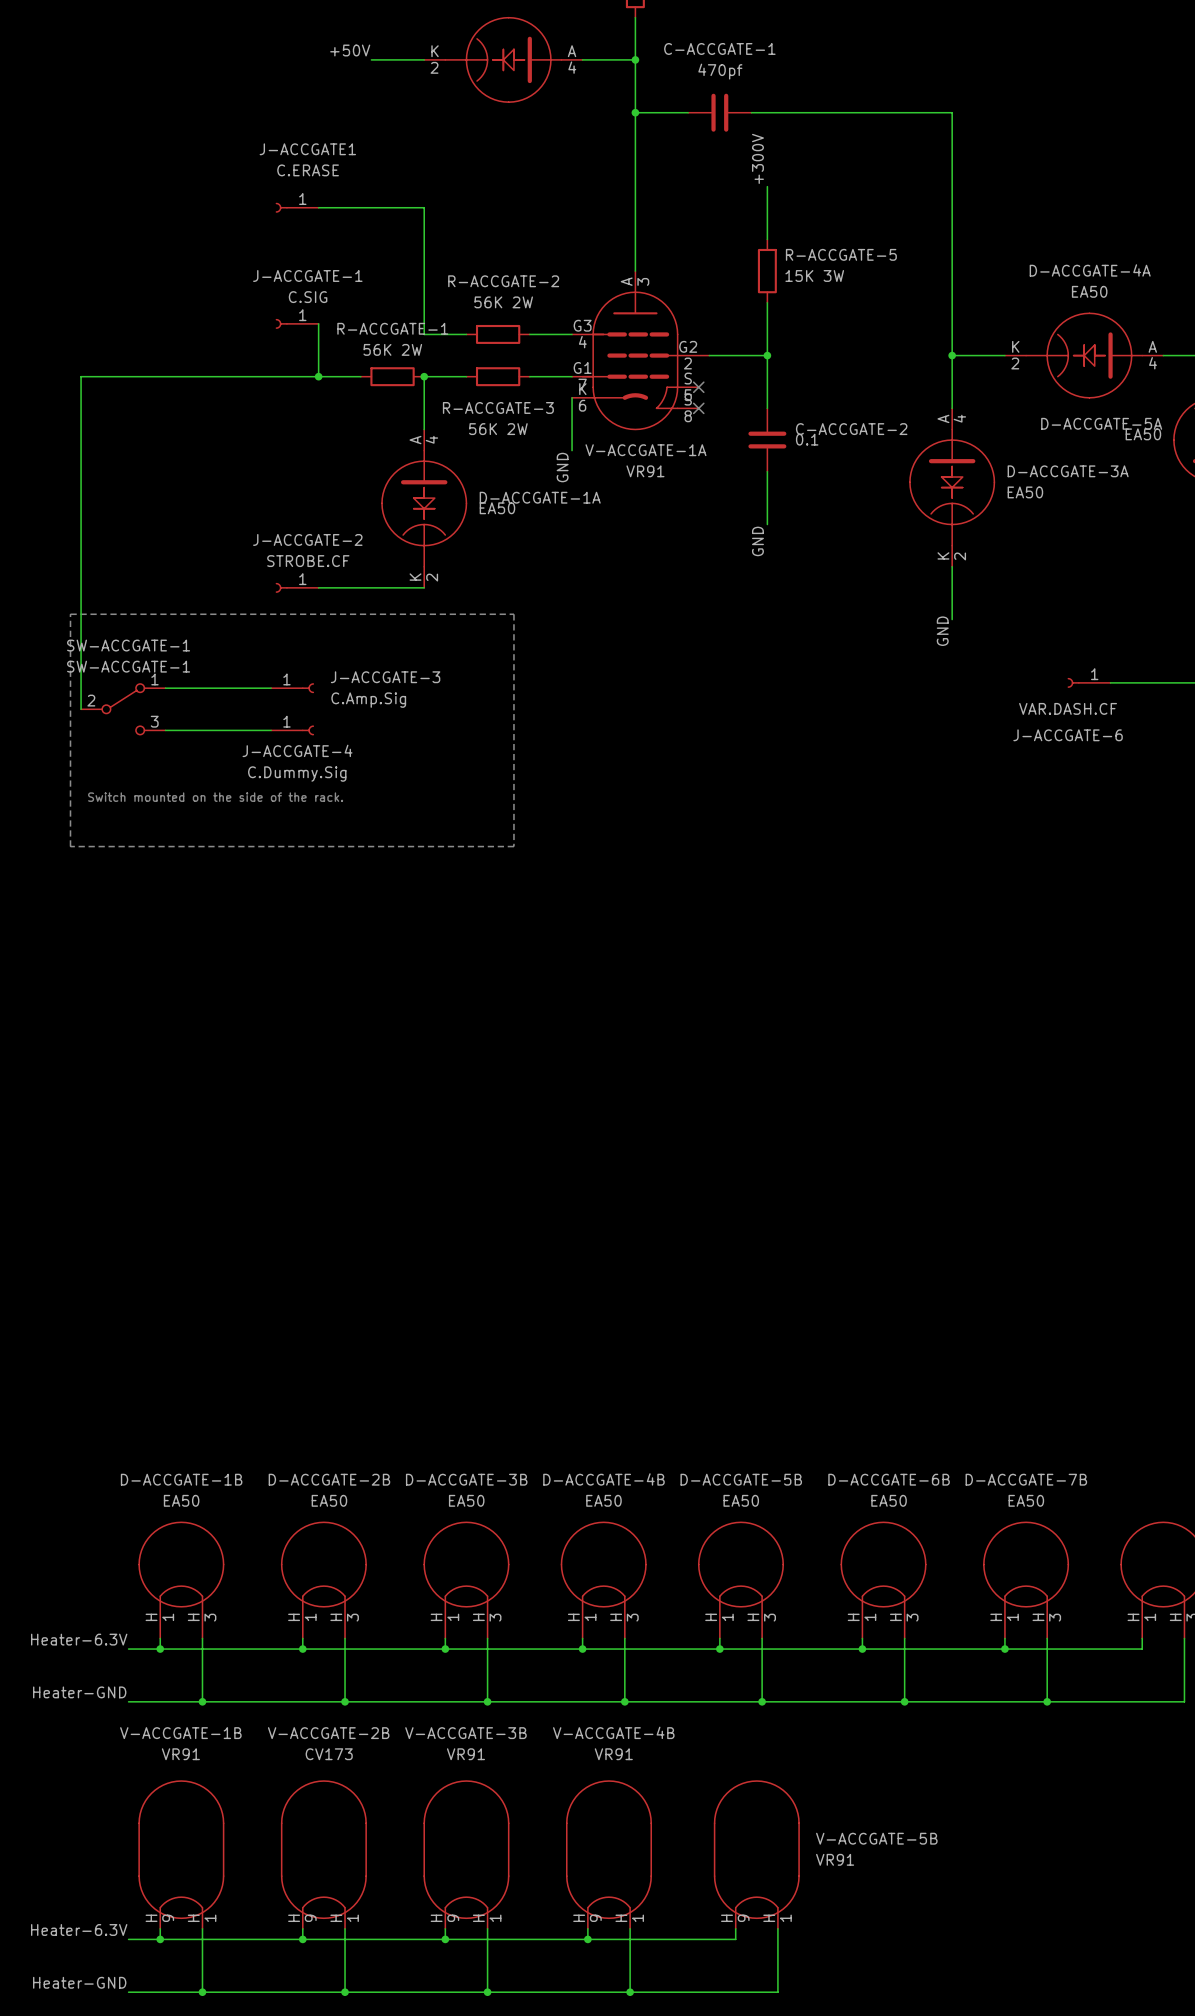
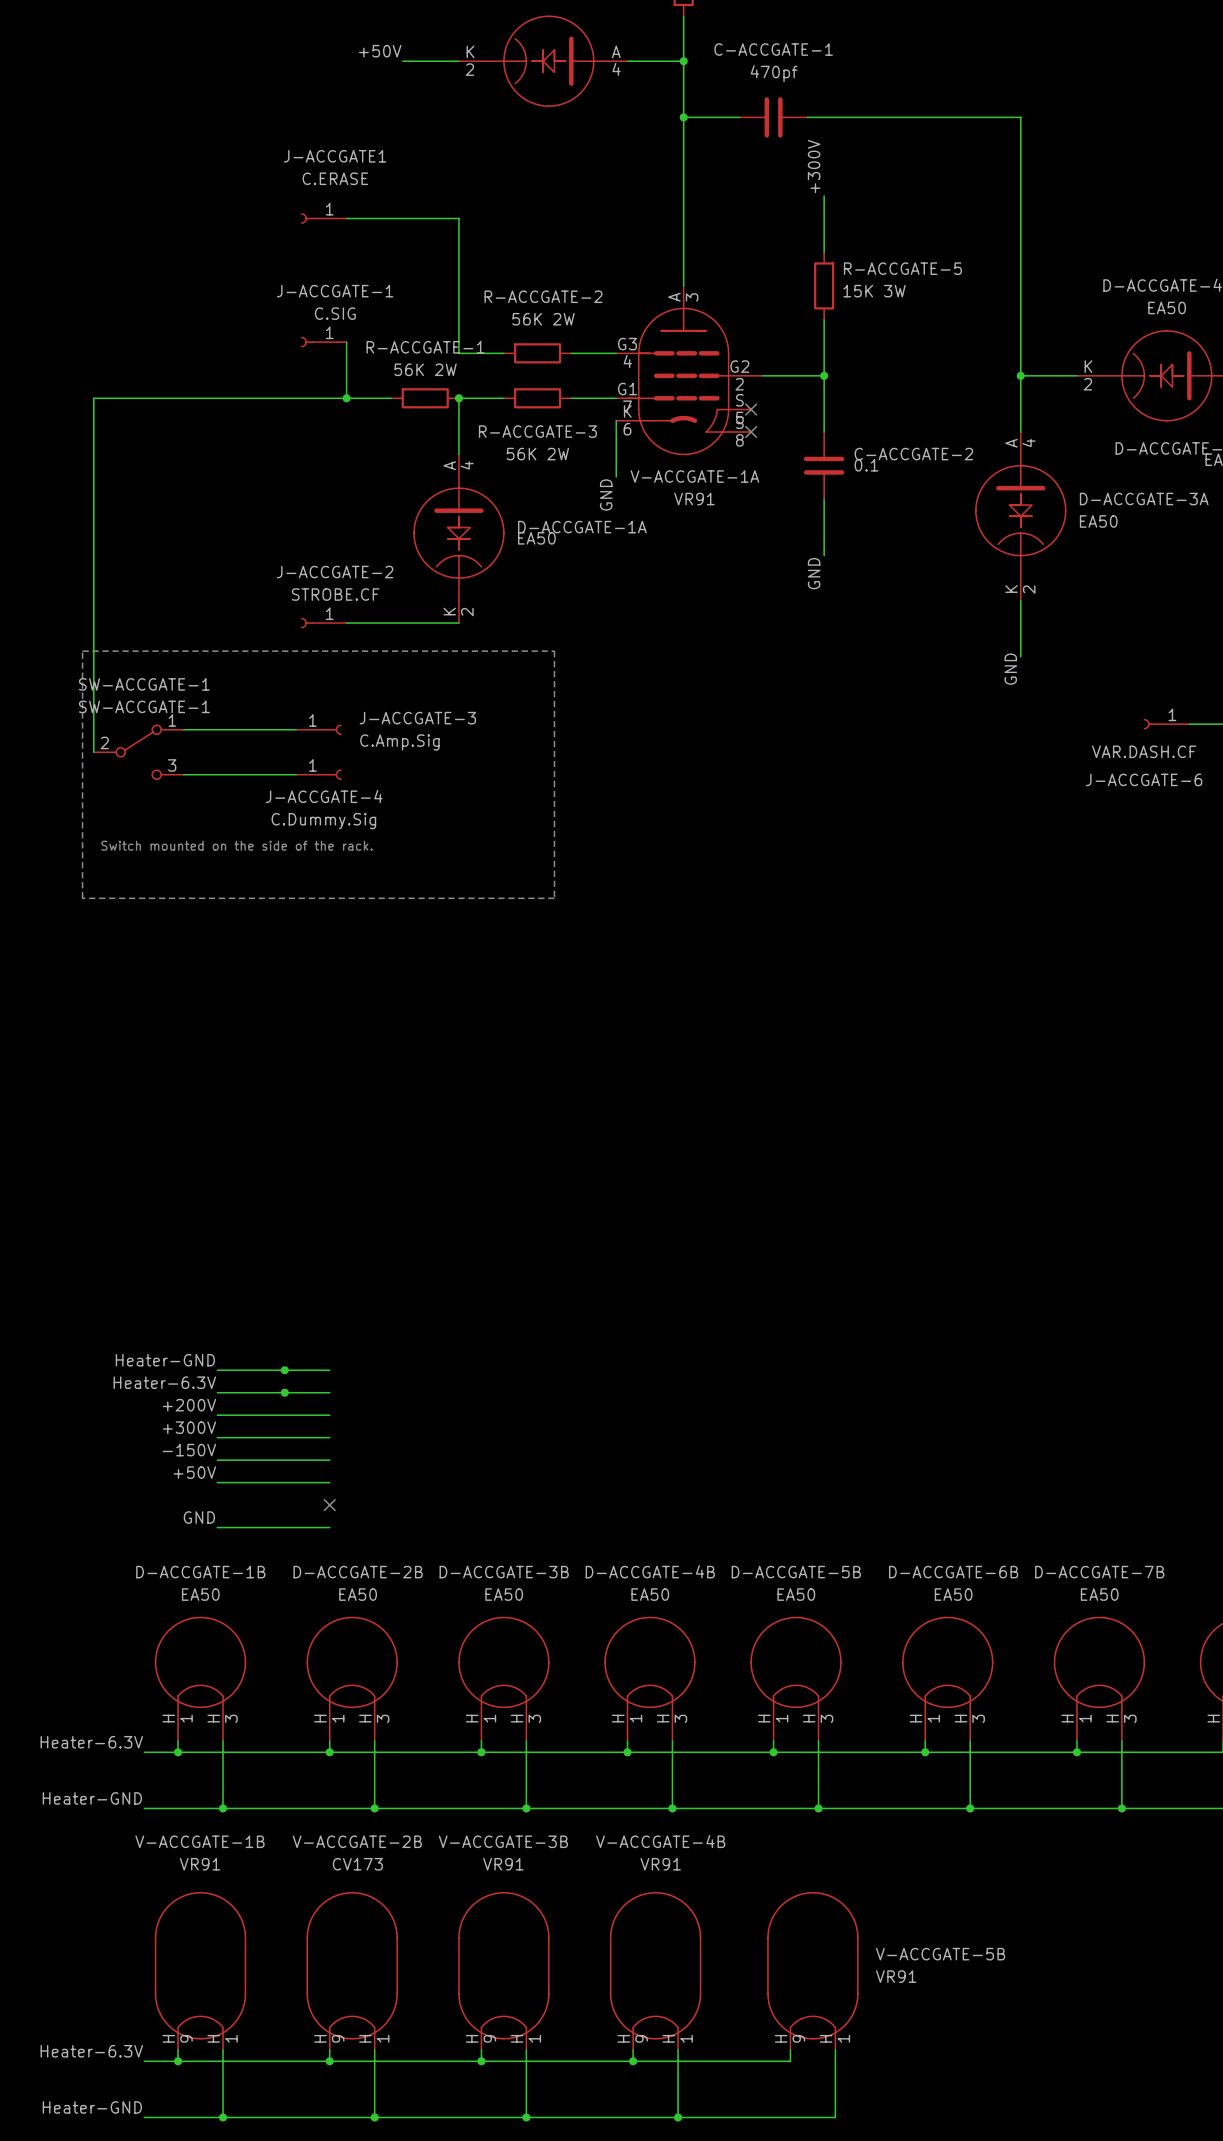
label: none -> Heater-GND (165, 1360)
wire: none -> (217, 1370) (329, 1370)
junction: none -> (284, 1370)
label: none -> Heater-6.3V (164, 1382)
wire: none -> (217, 1392) (329, 1392)
junction: none -> (284, 1392)
label: none -> +200V (189, 1405)
wire: none -> (217, 1415) (329, 1415)
label: none -> +300V (189, 1427)
wire: none -> (217, 1437) (329, 1437)
label: none -> -150V (189, 1450)
wire: none -> (217, 1460) (329, 1460)
label: none -> +50V (194, 1472)
wire: none -> (217, 1482) (329, 1482)
no-connect mark: none -> (329, 1505)
label: none -> GND (199, 1517)
wire: none -> (217, 1527) (329, 1527)

